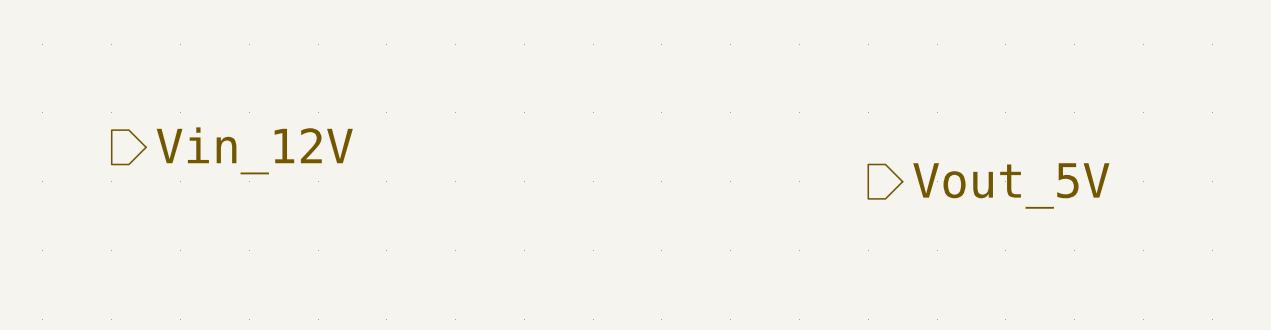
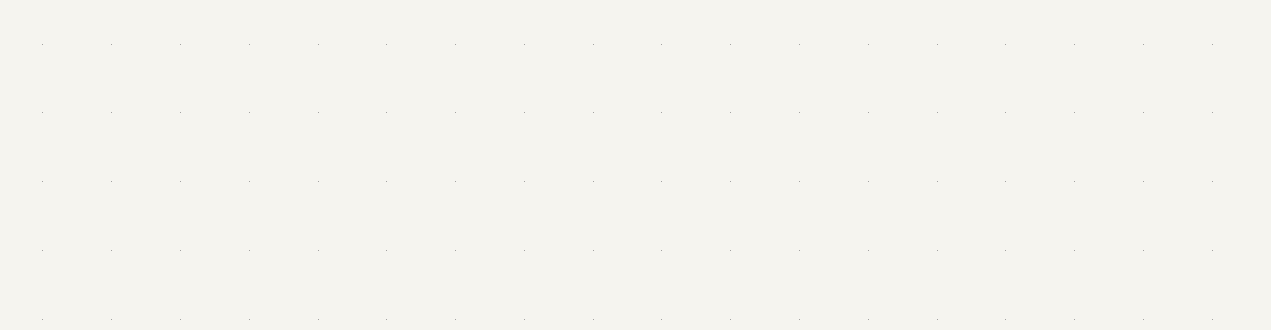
hierarchical label: Vin_12V (254, 150) -> none
hierarchical label: Vout_5V (1011, 185) -> none

